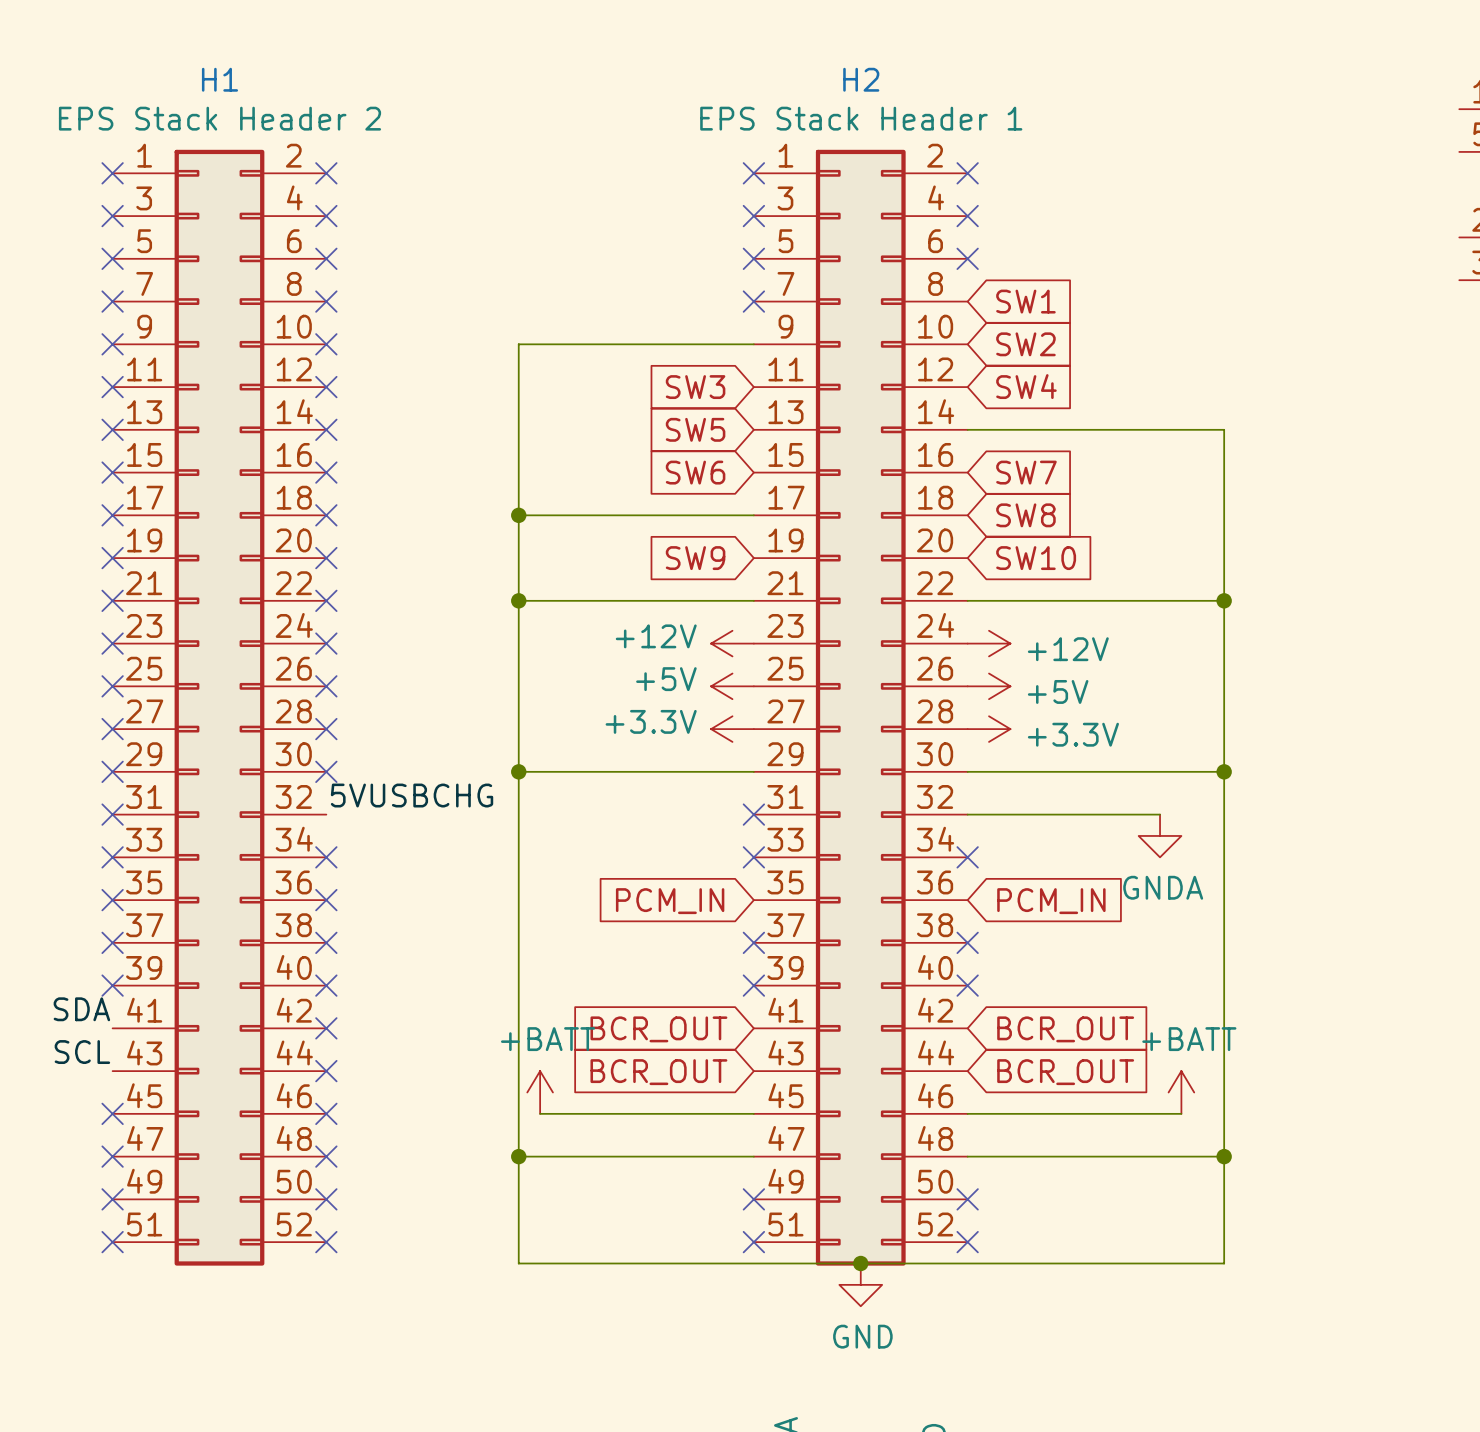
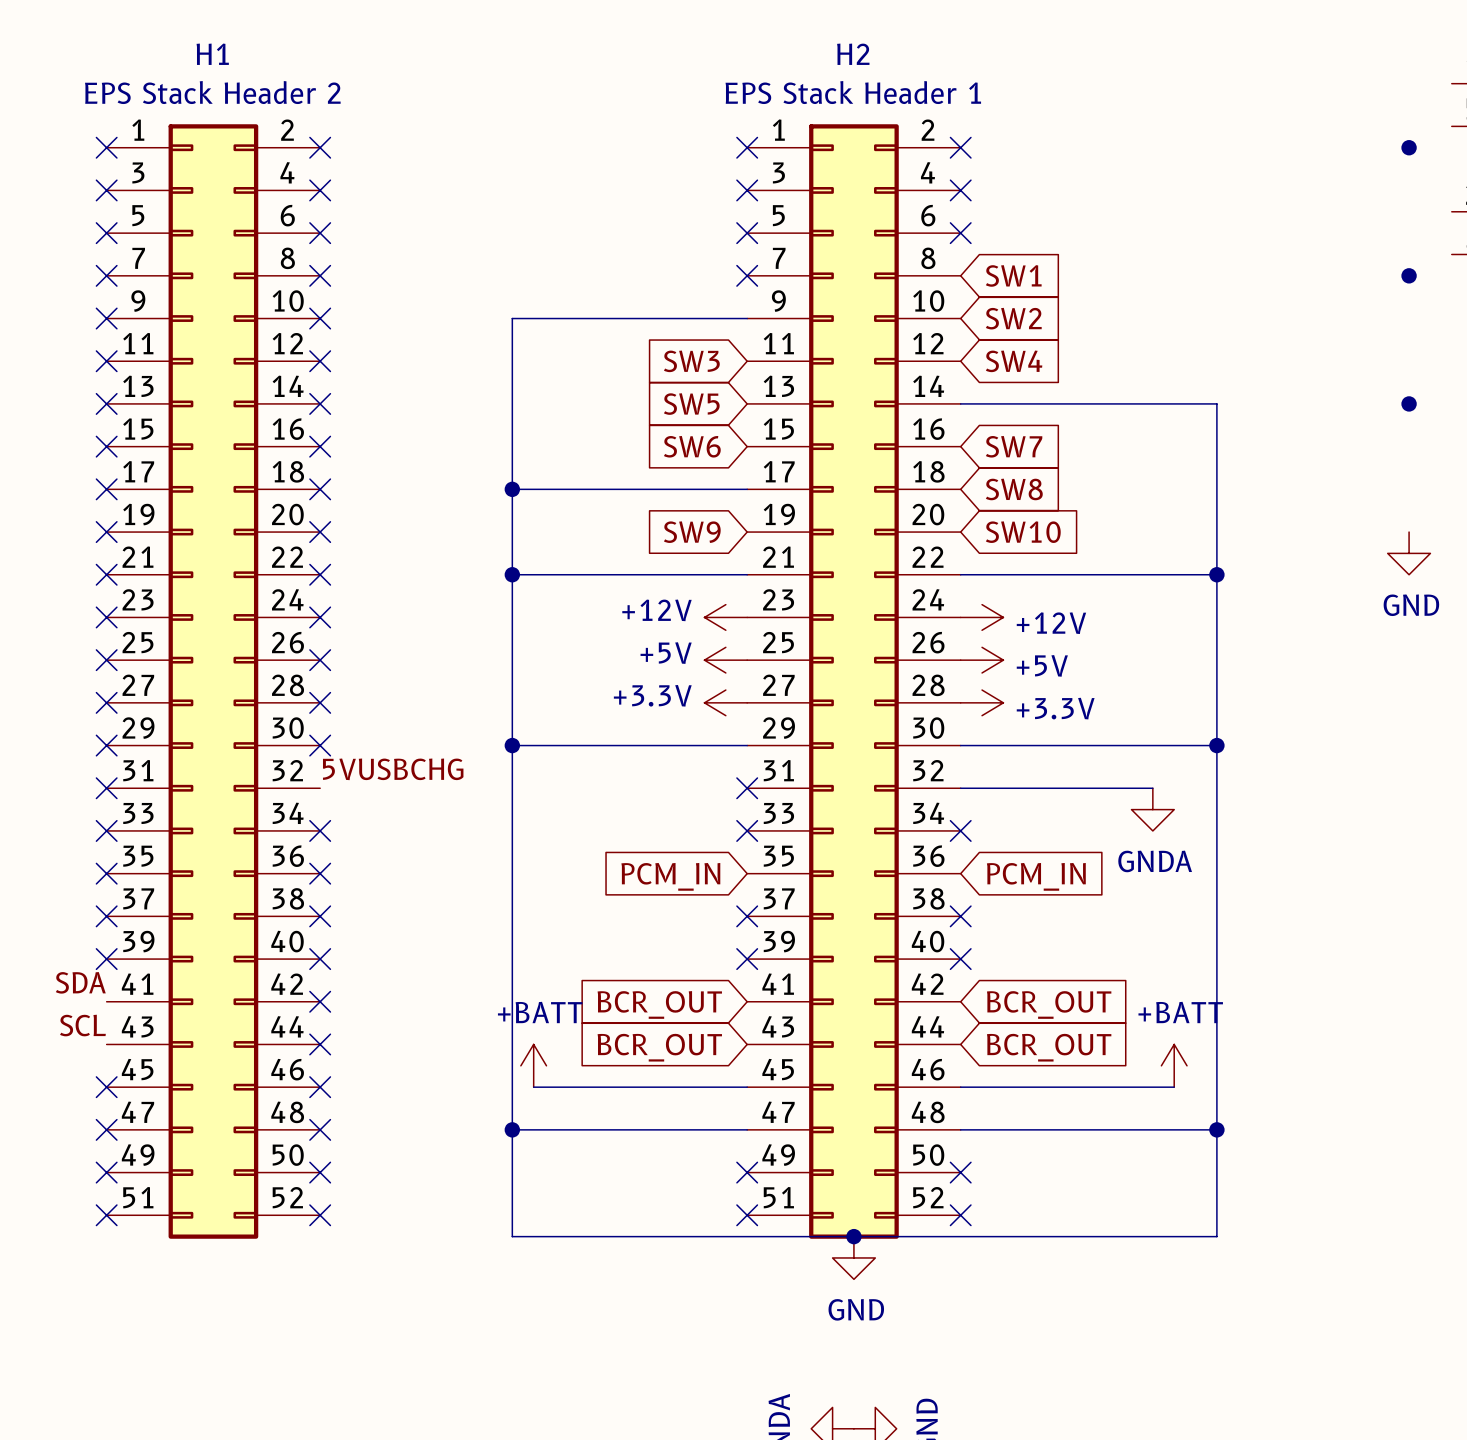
junction: none -> (1409, 147)
junction: none -> (1409, 275)
junction: none -> (1409, 403)
power symbol: none -> GND (1409, 553)

